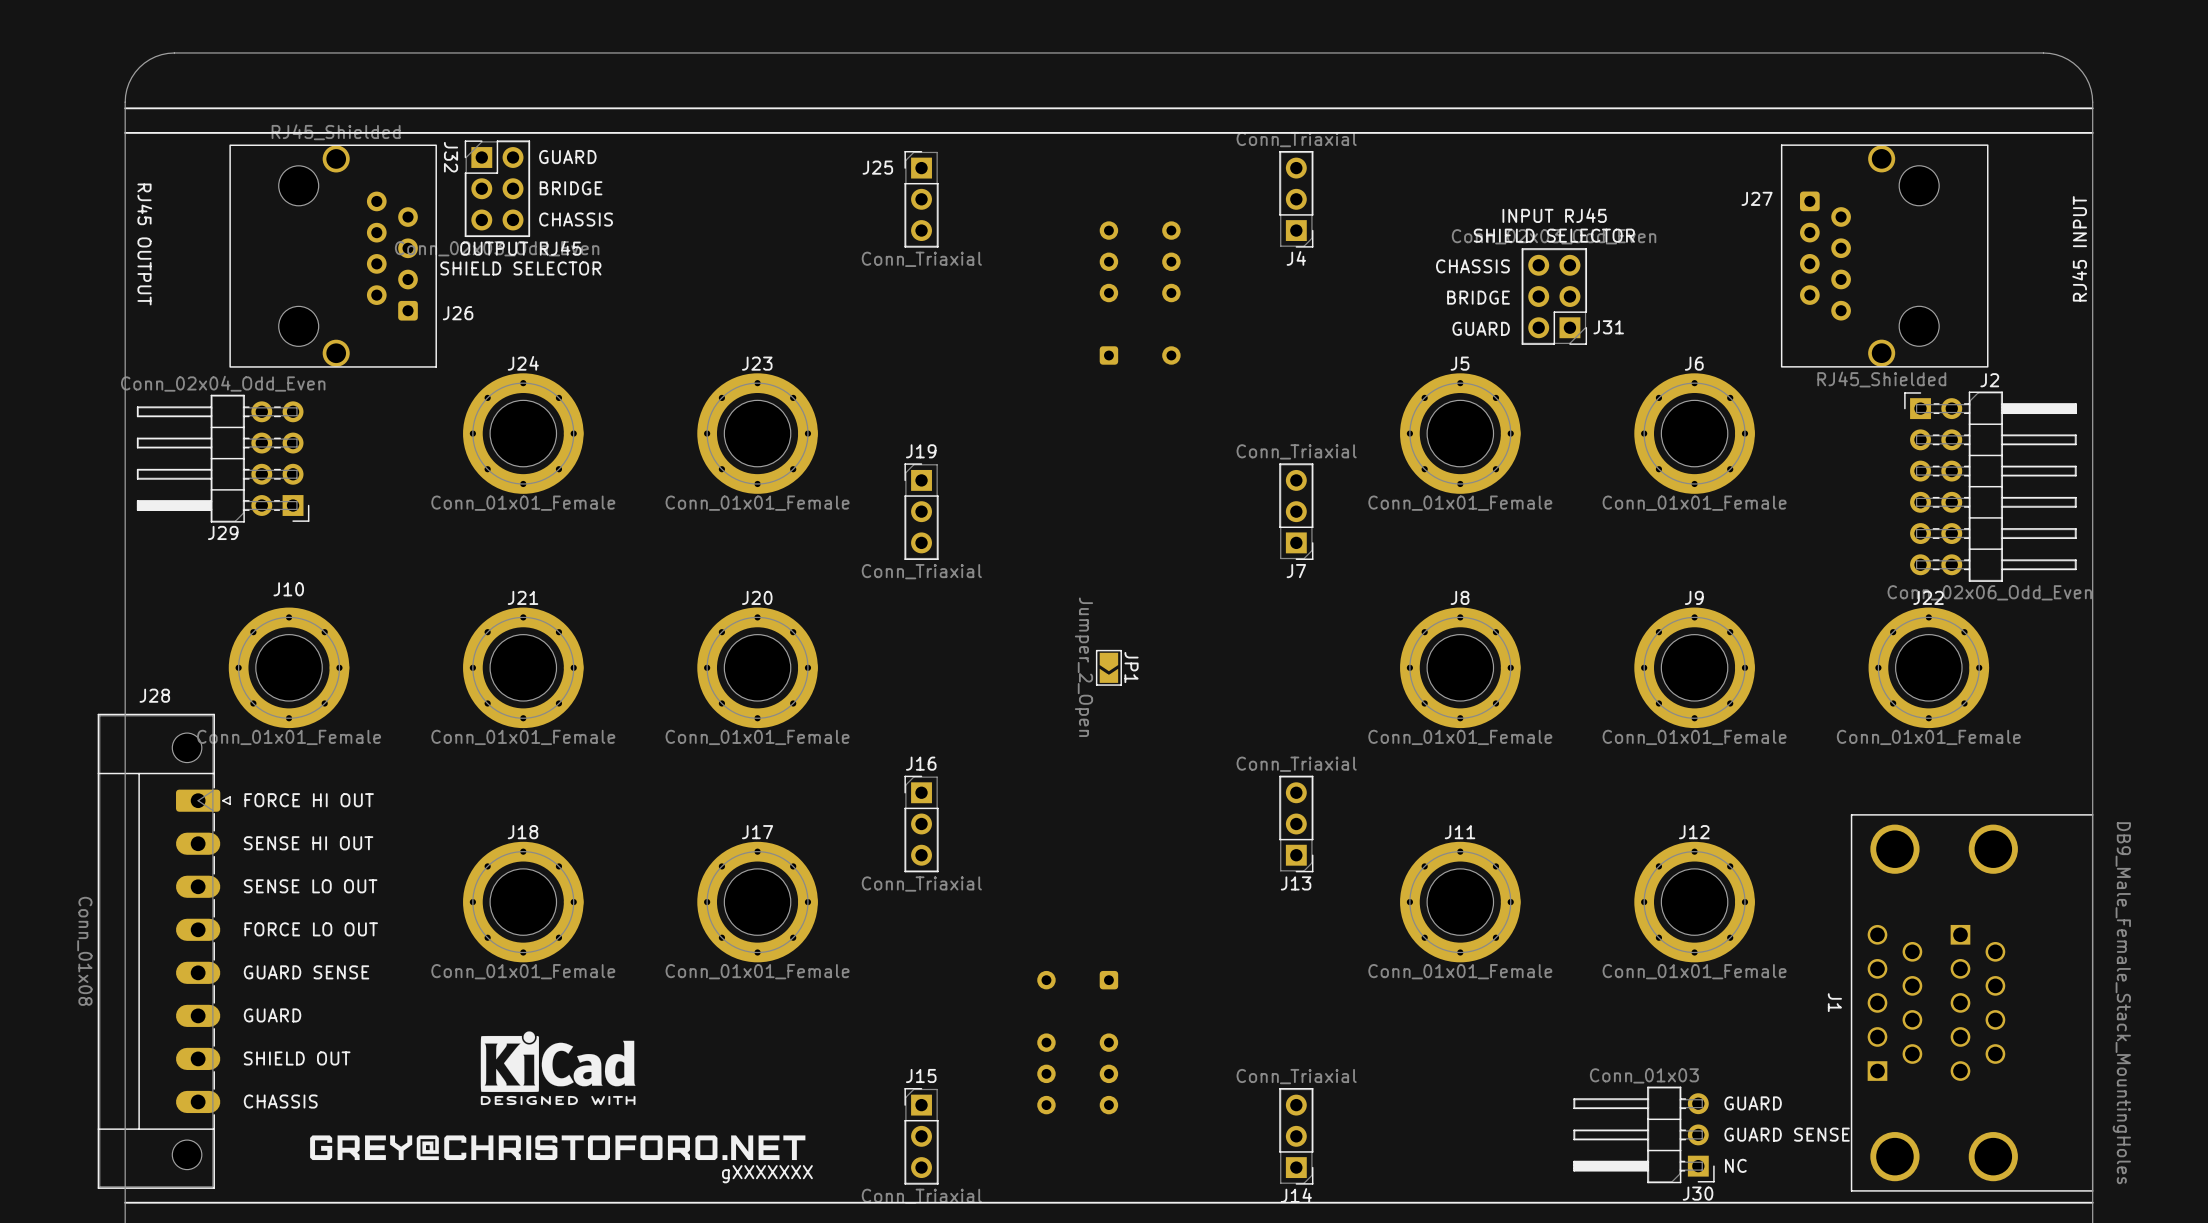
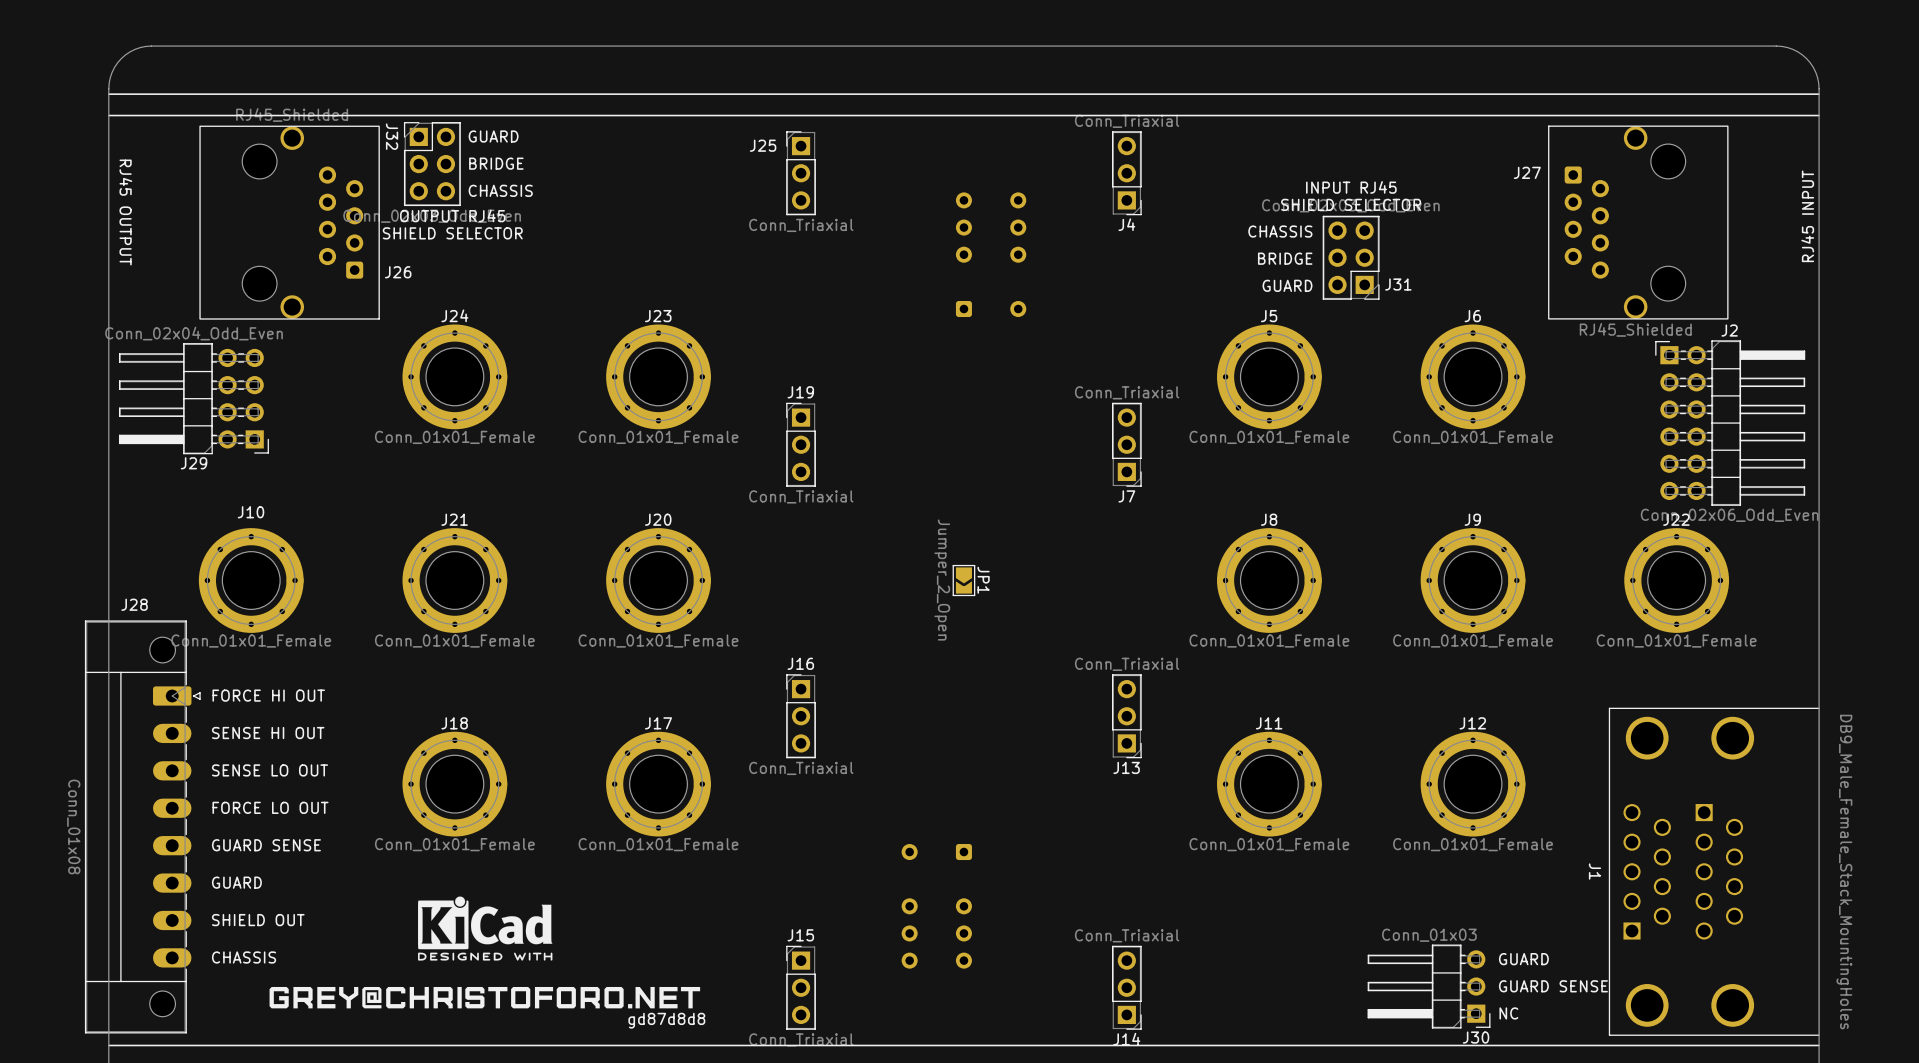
text: gXXXXXXX (767, 1174) -> gd87d8d8 (666, 1020)

